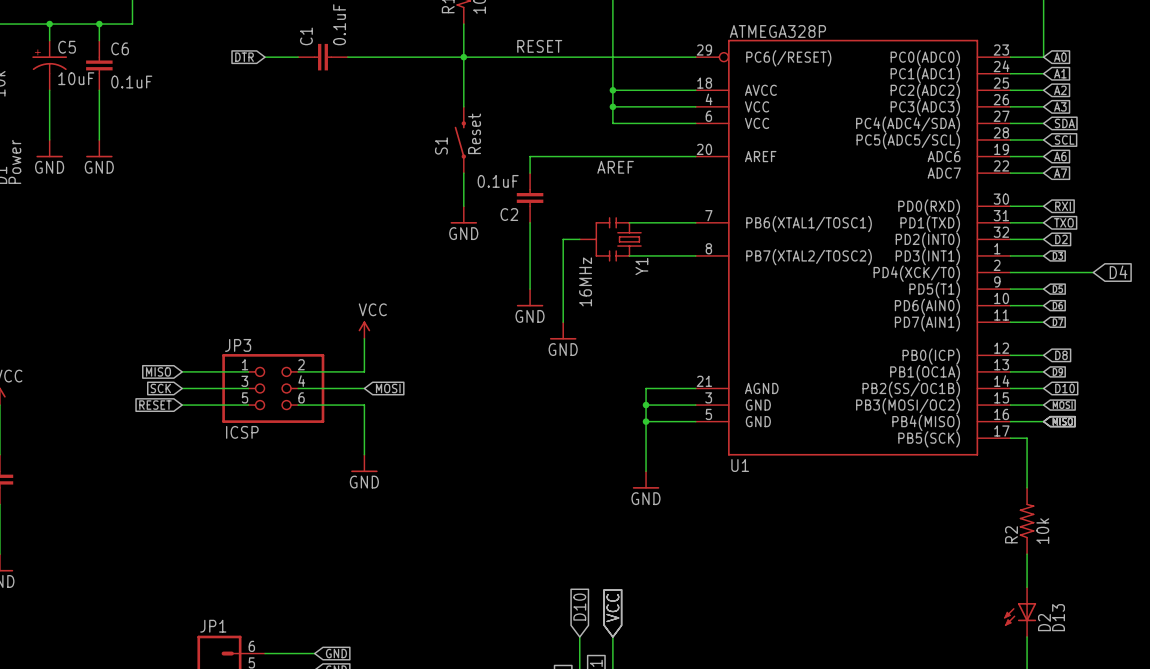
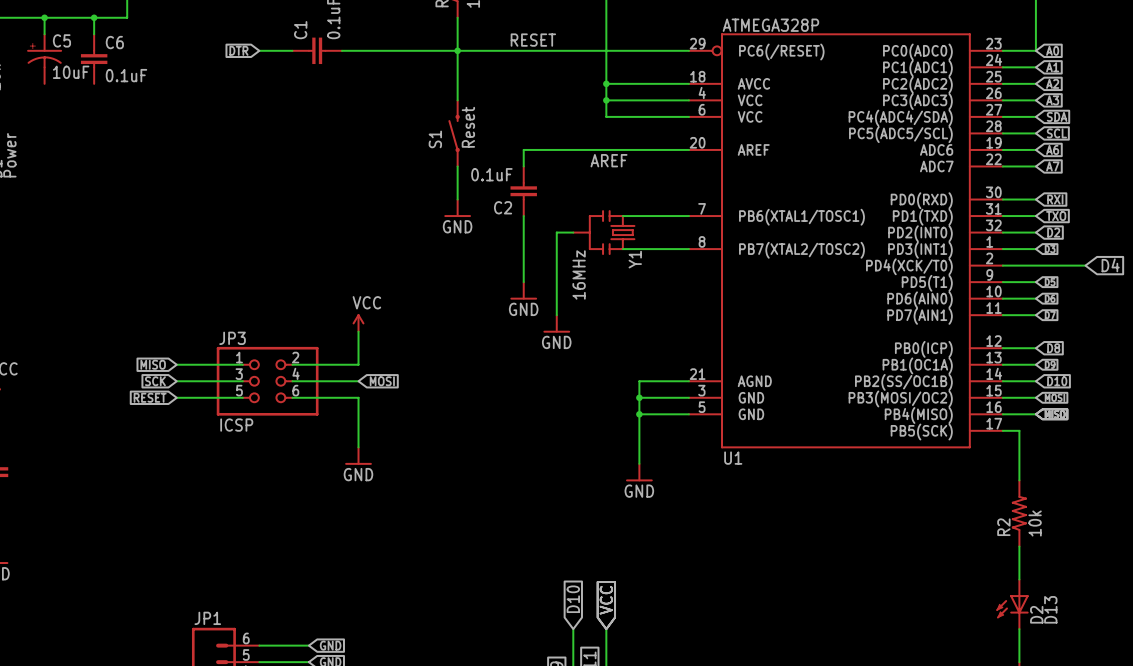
wire: (49, 90) (49, 139) -> none
wire: (99, 90) (99, 139) -> none
power symbol: GND (49, 148) -> none
power symbol: GND (99, 148) -> none

